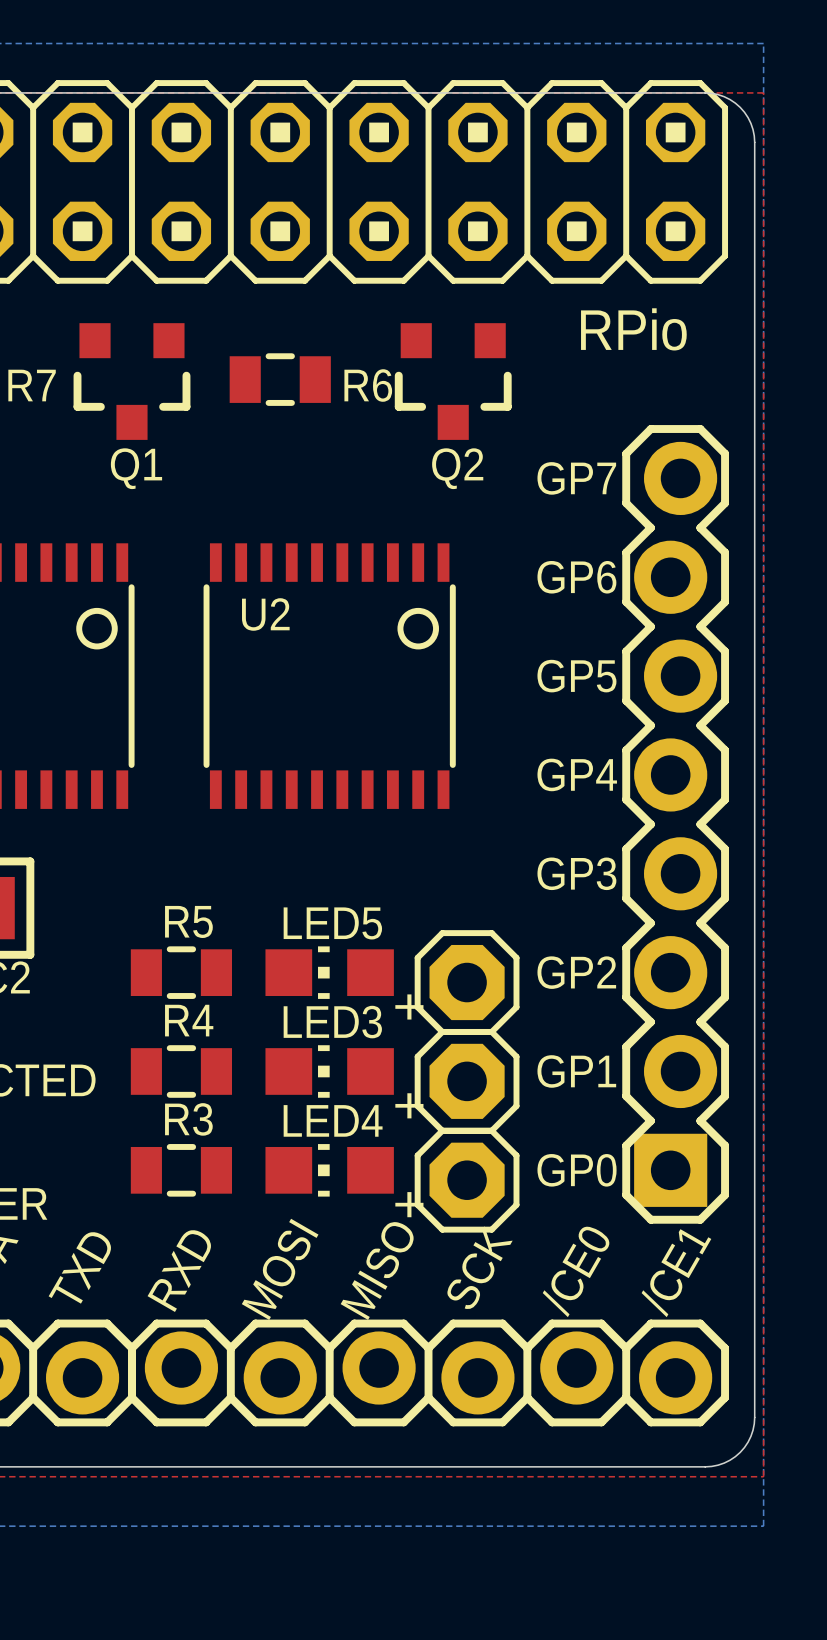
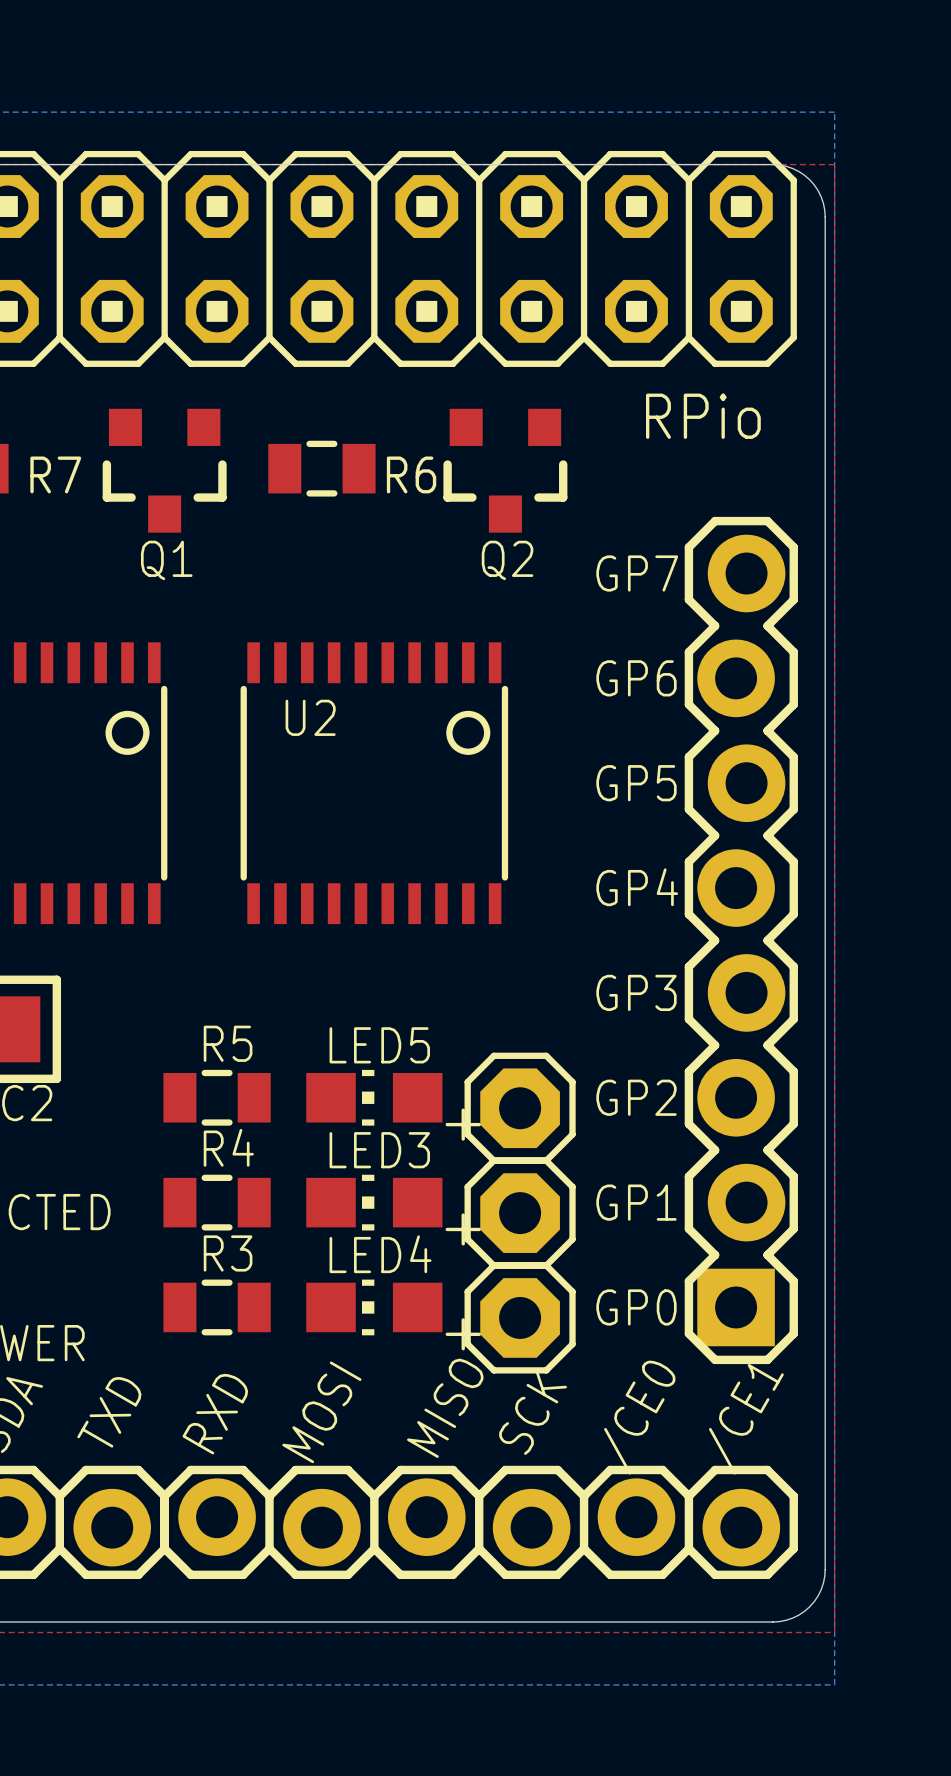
text position: MISO (377, 1270) -> MISO (445, 1408)

